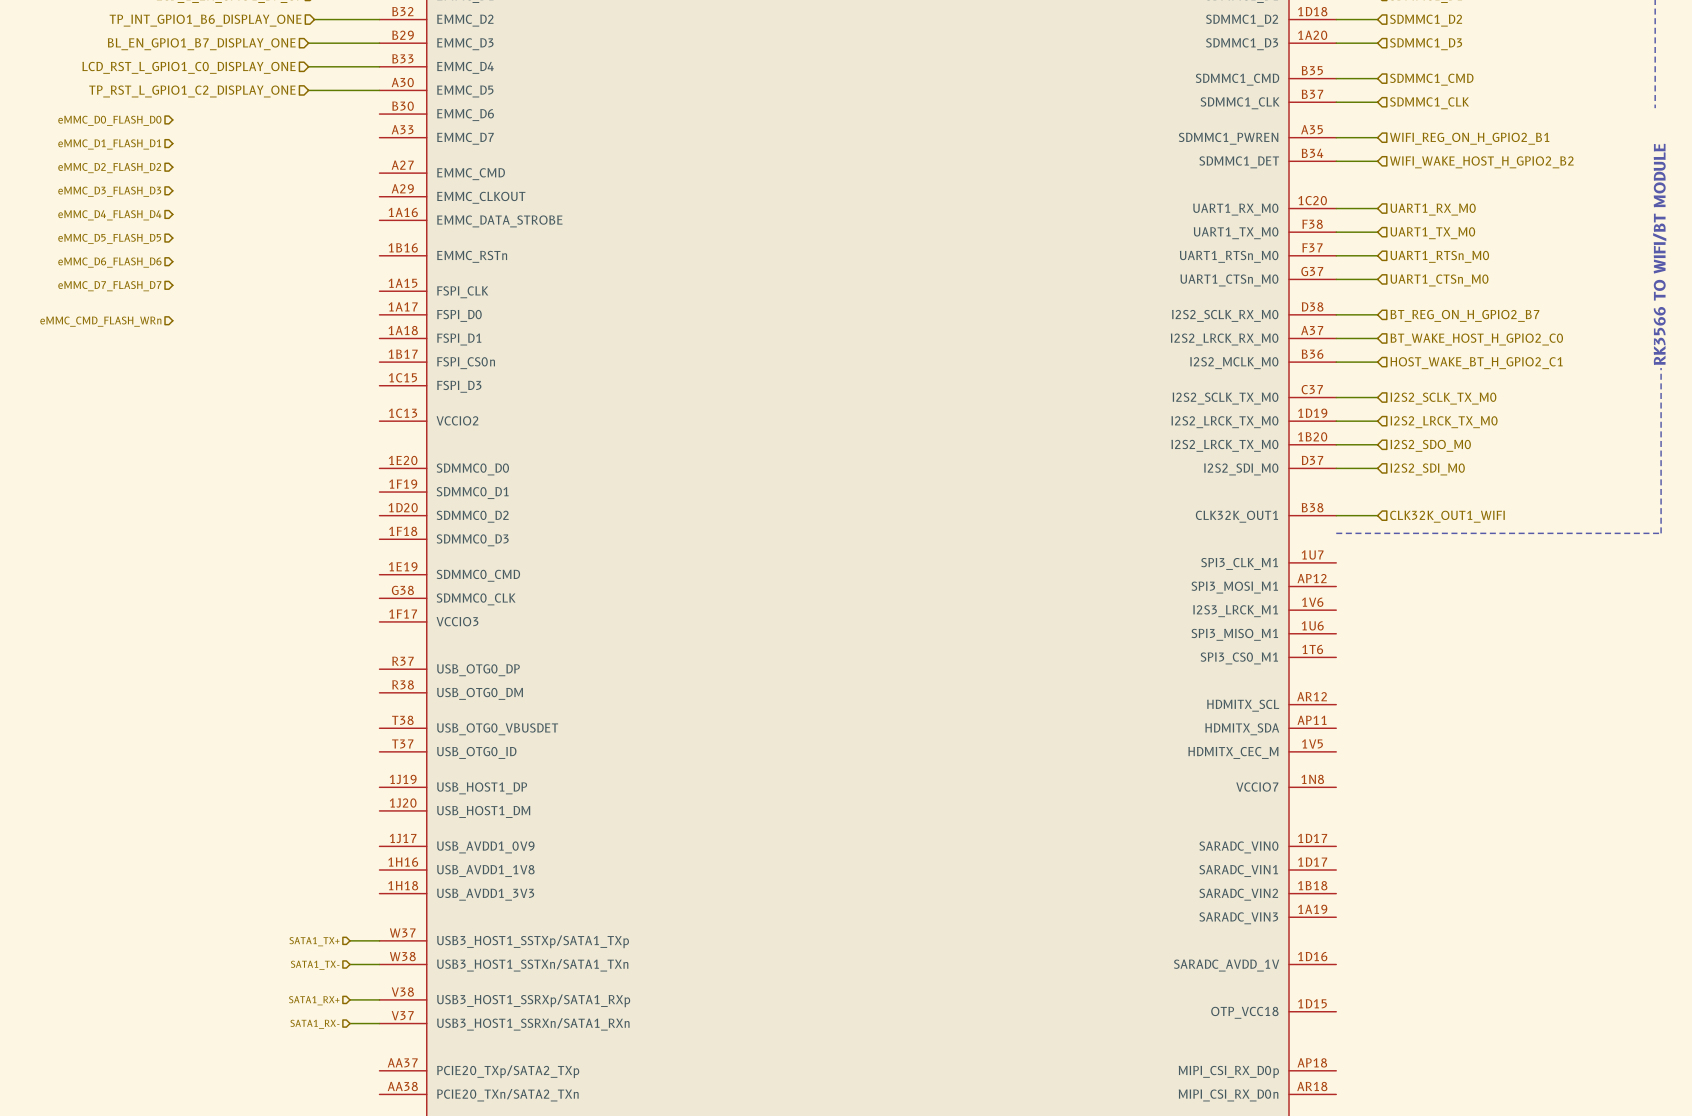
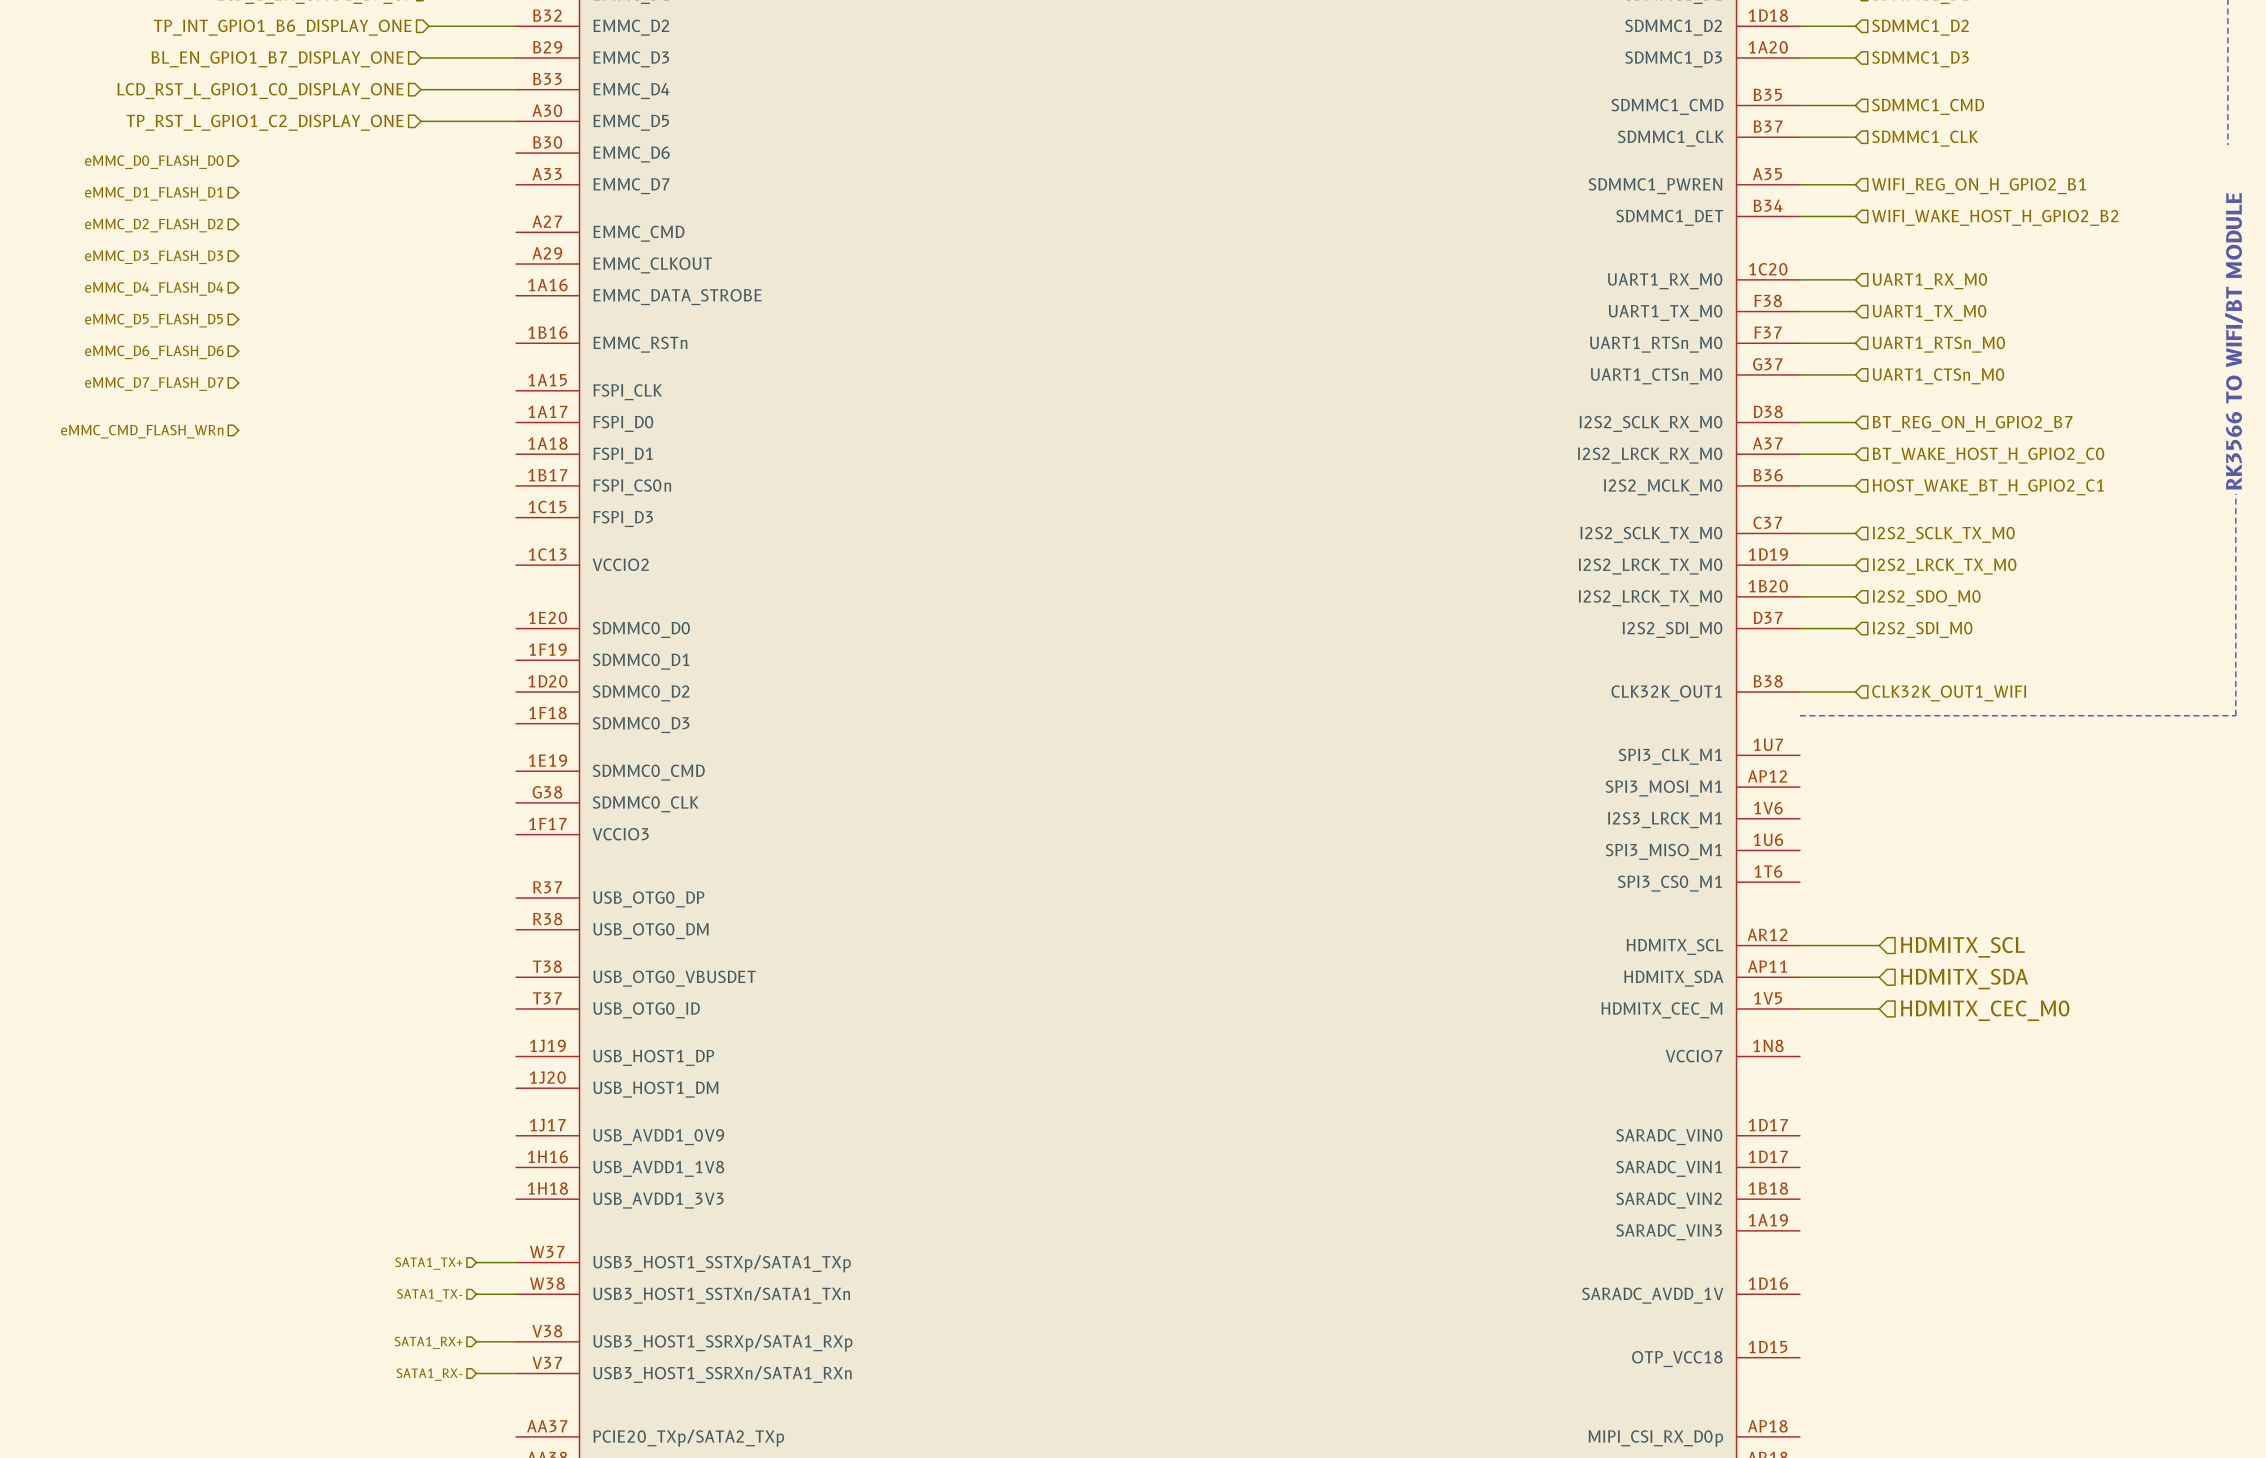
wire: none -> (1799, 945) (1879, 945)
hierarchical label: none -> HDMITX_SCL (1962, 947)
wire: none -> (1799, 977) (1879, 977)
hierarchical label: none -> HDMITX_SDA (1964, 979)
wire: none -> (1799, 1008) (1879, 1008)
hierarchical label: none -> HDMITX_CEC_M0 (1985, 1010)

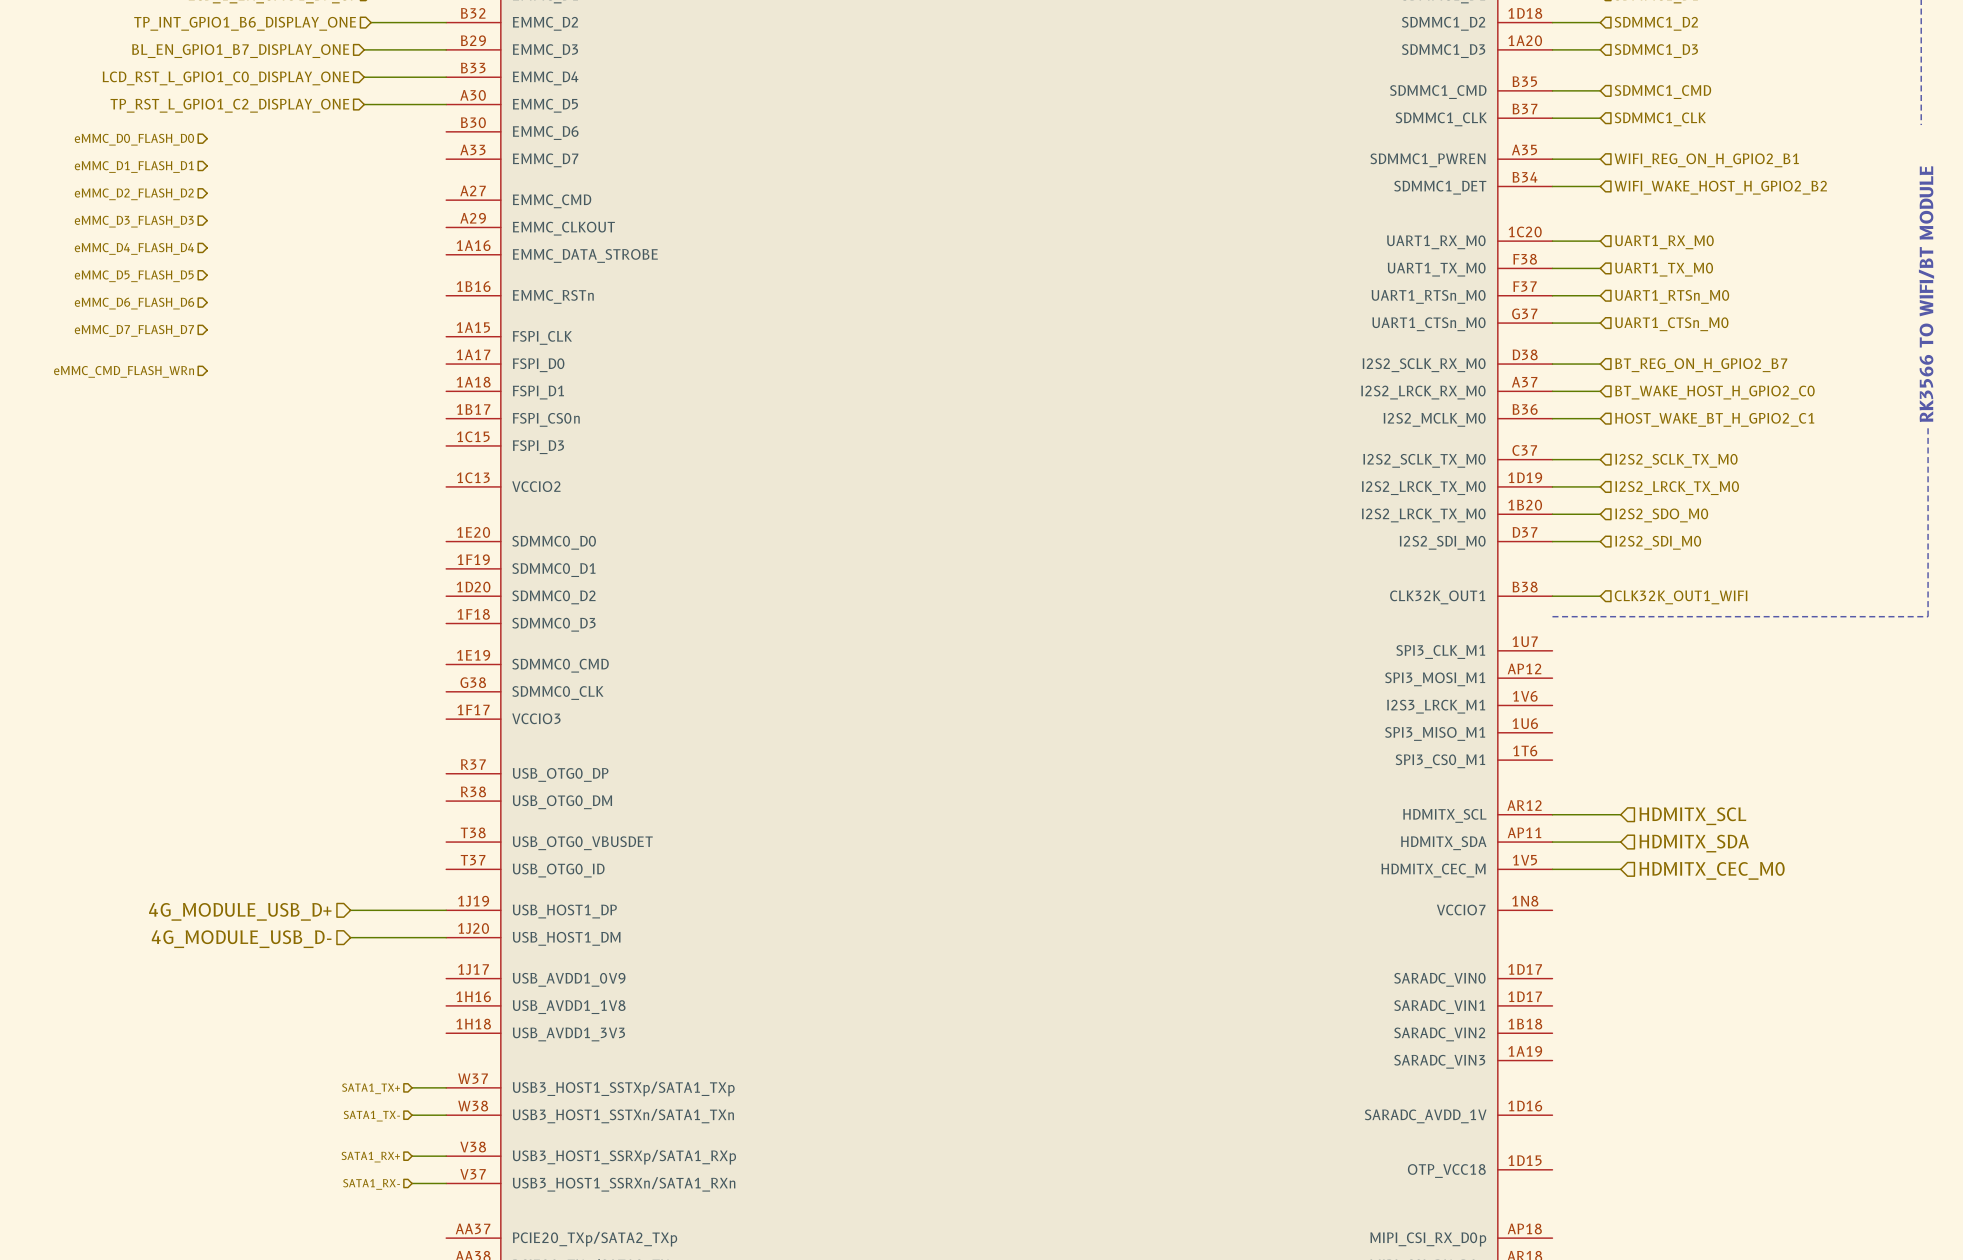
wire: none -> (350, 910) (446, 910)
hierarchical label: none -> 4G_MODULE_USB_D+ (240, 911)
wire: none -> (350, 937) (446, 937)
hierarchical label: none -> 4G_MODULE_USB_D- (241, 939)

